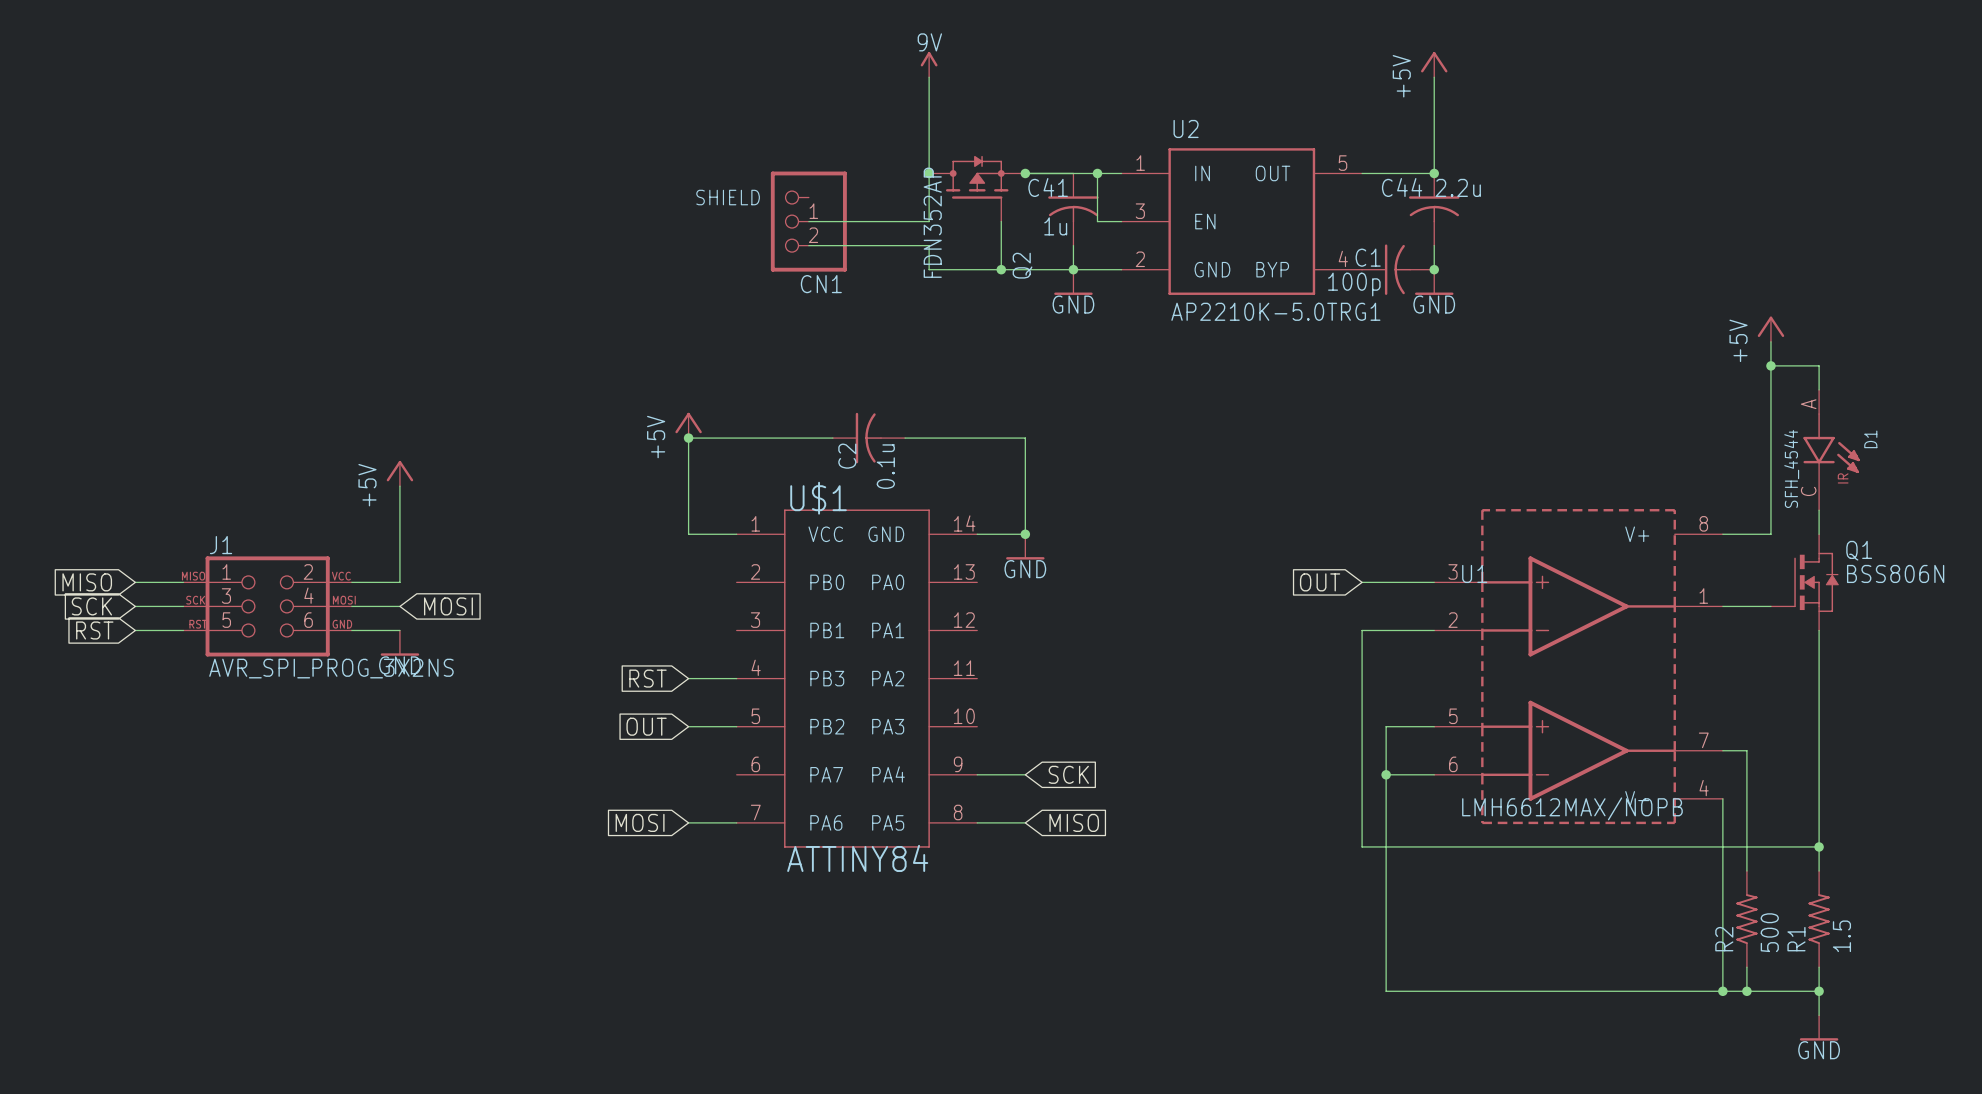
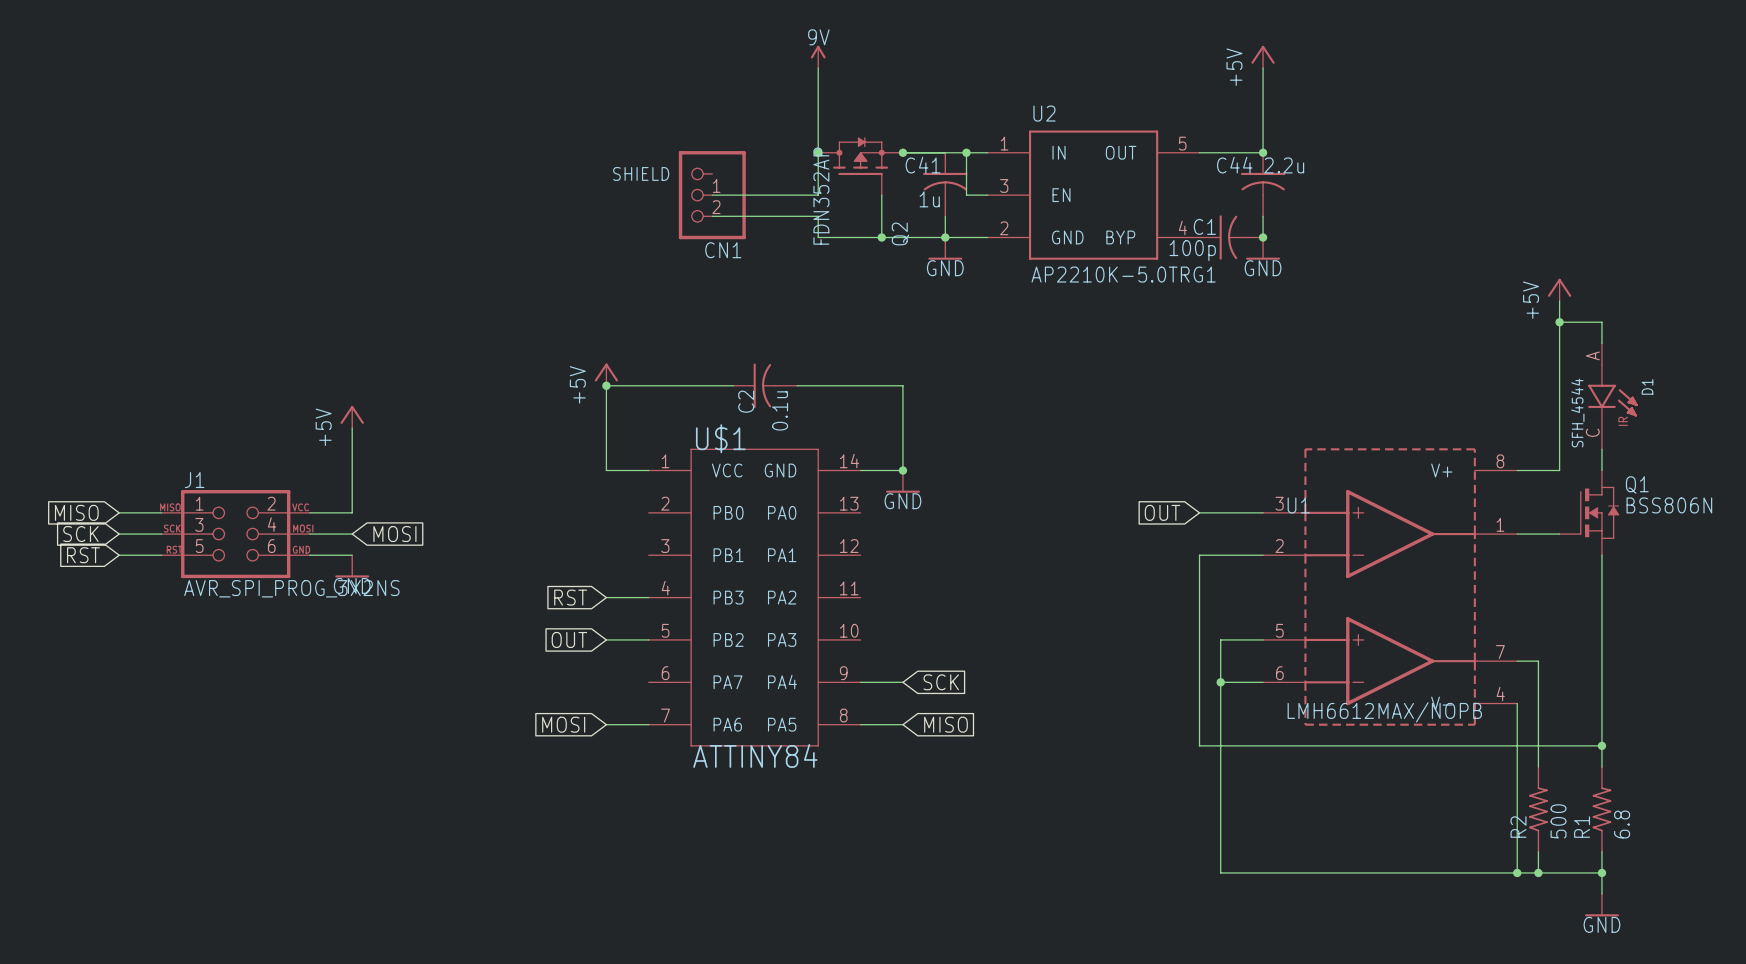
R1 value: 1.5 (1841, 936) -> 6.8 (1622, 824)

